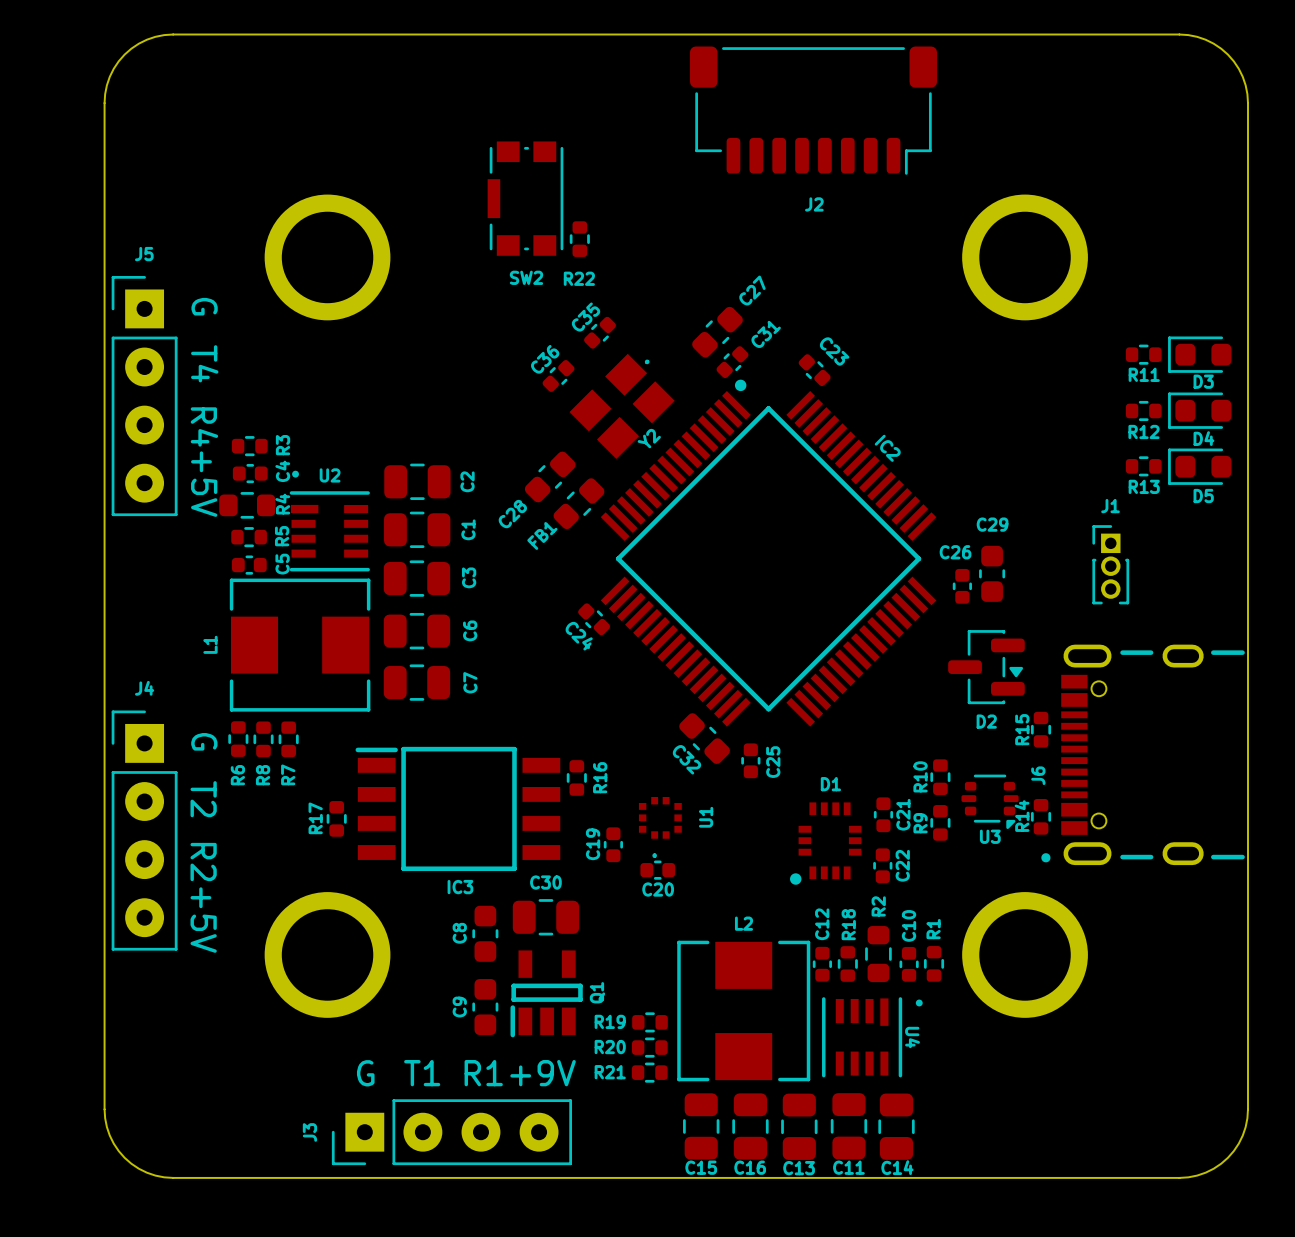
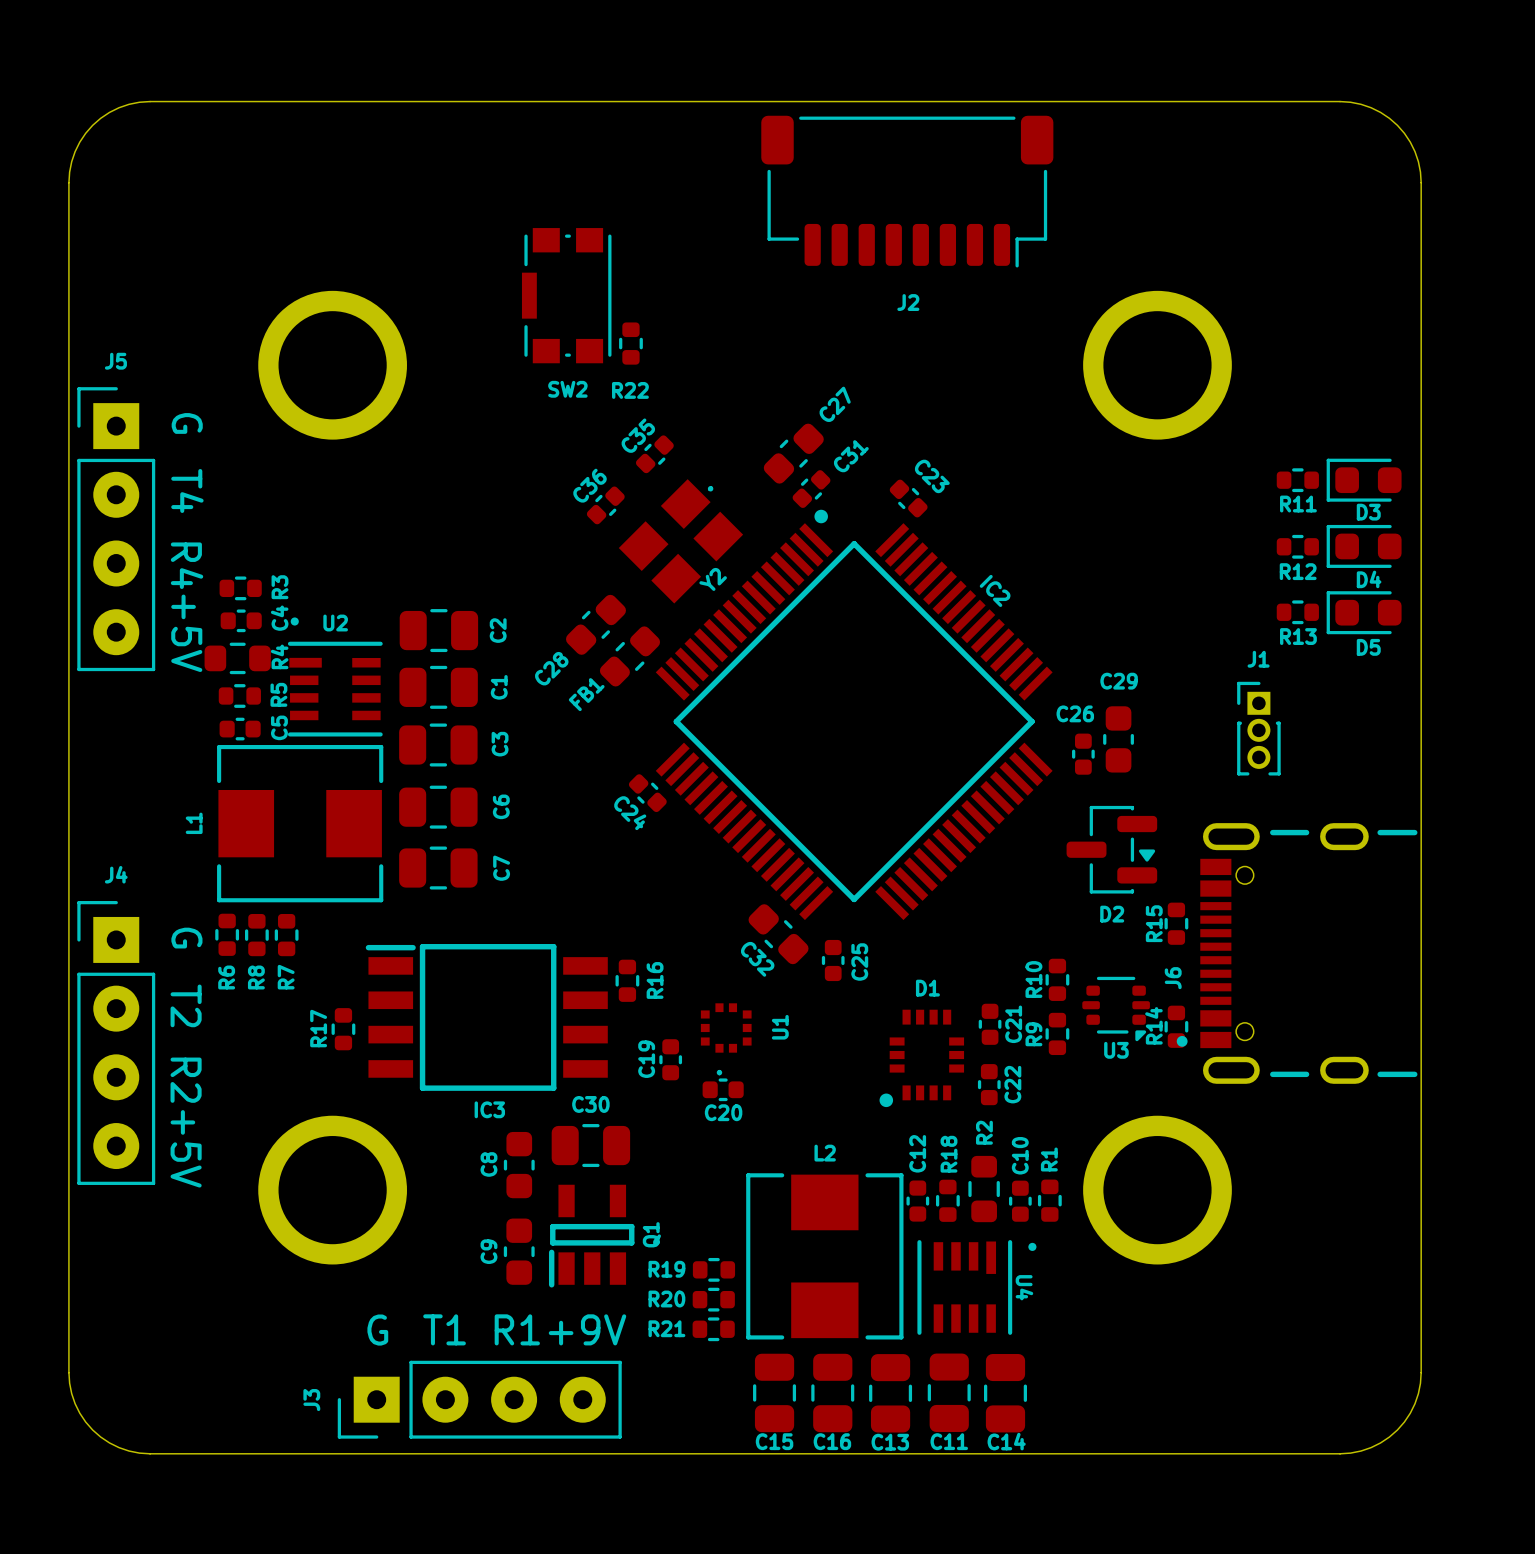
J6 footprint: [1041, 644, 1245, 866] -> [1176, 823, 1418, 1084]

